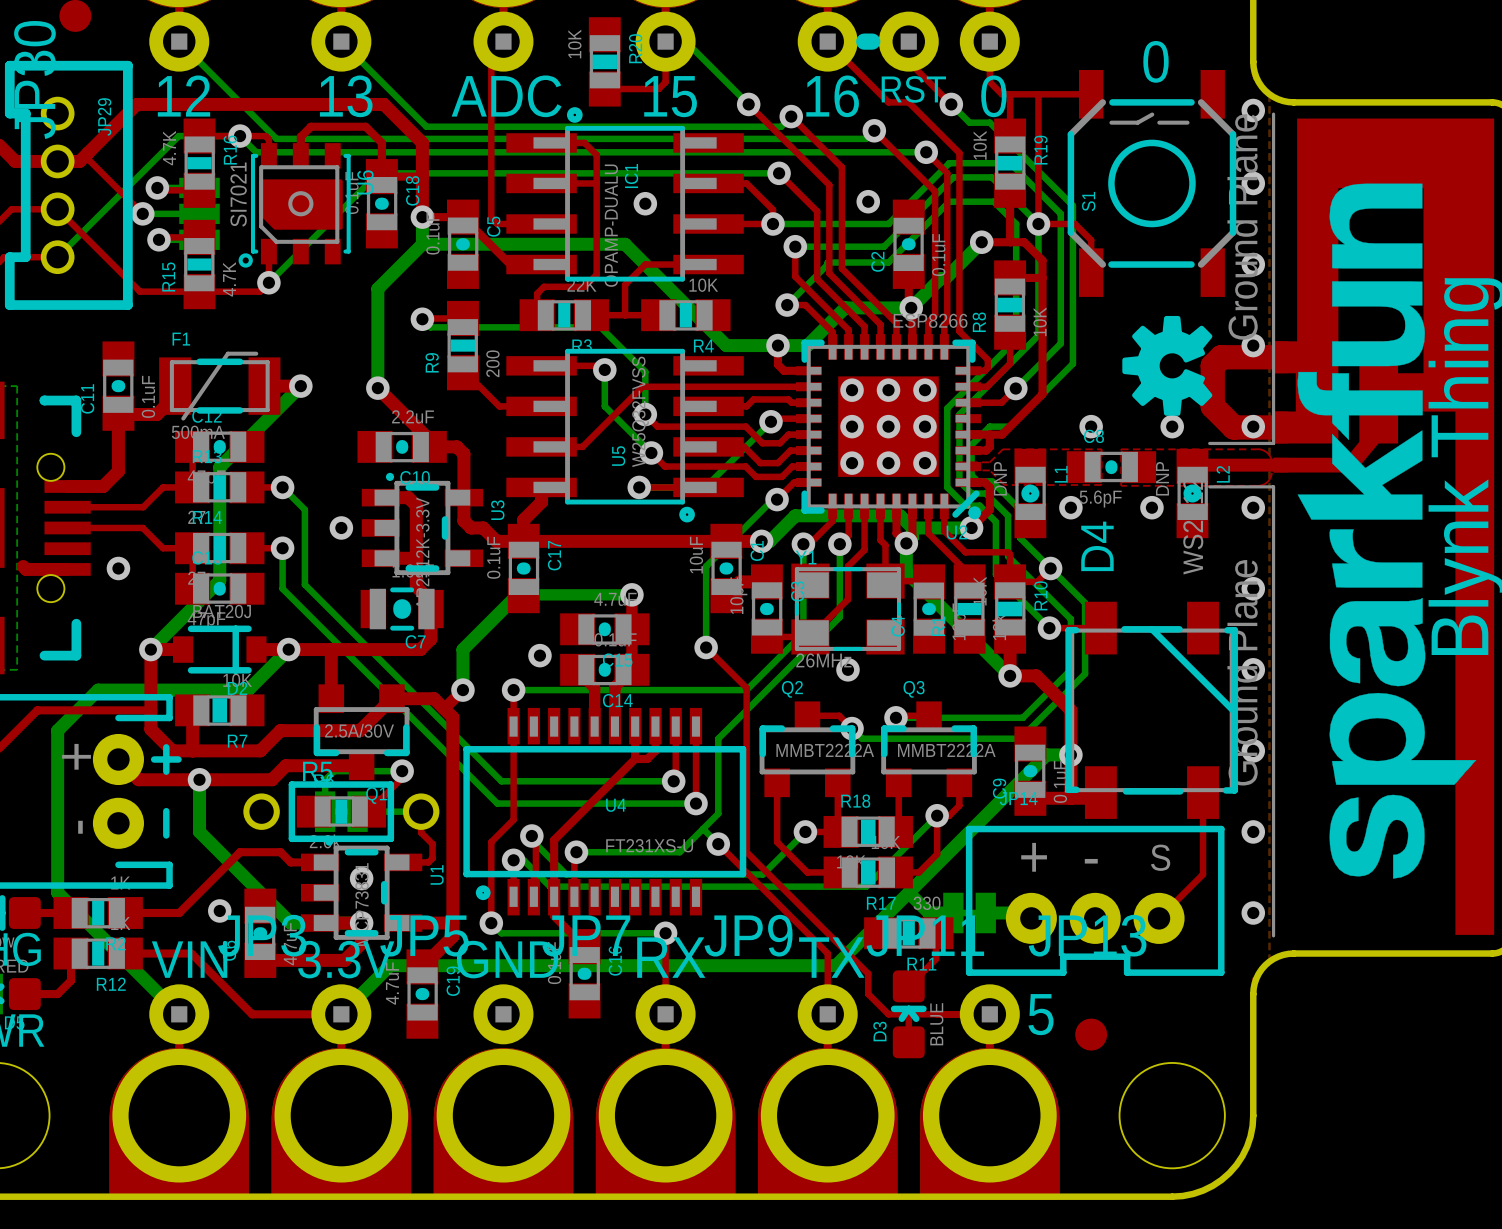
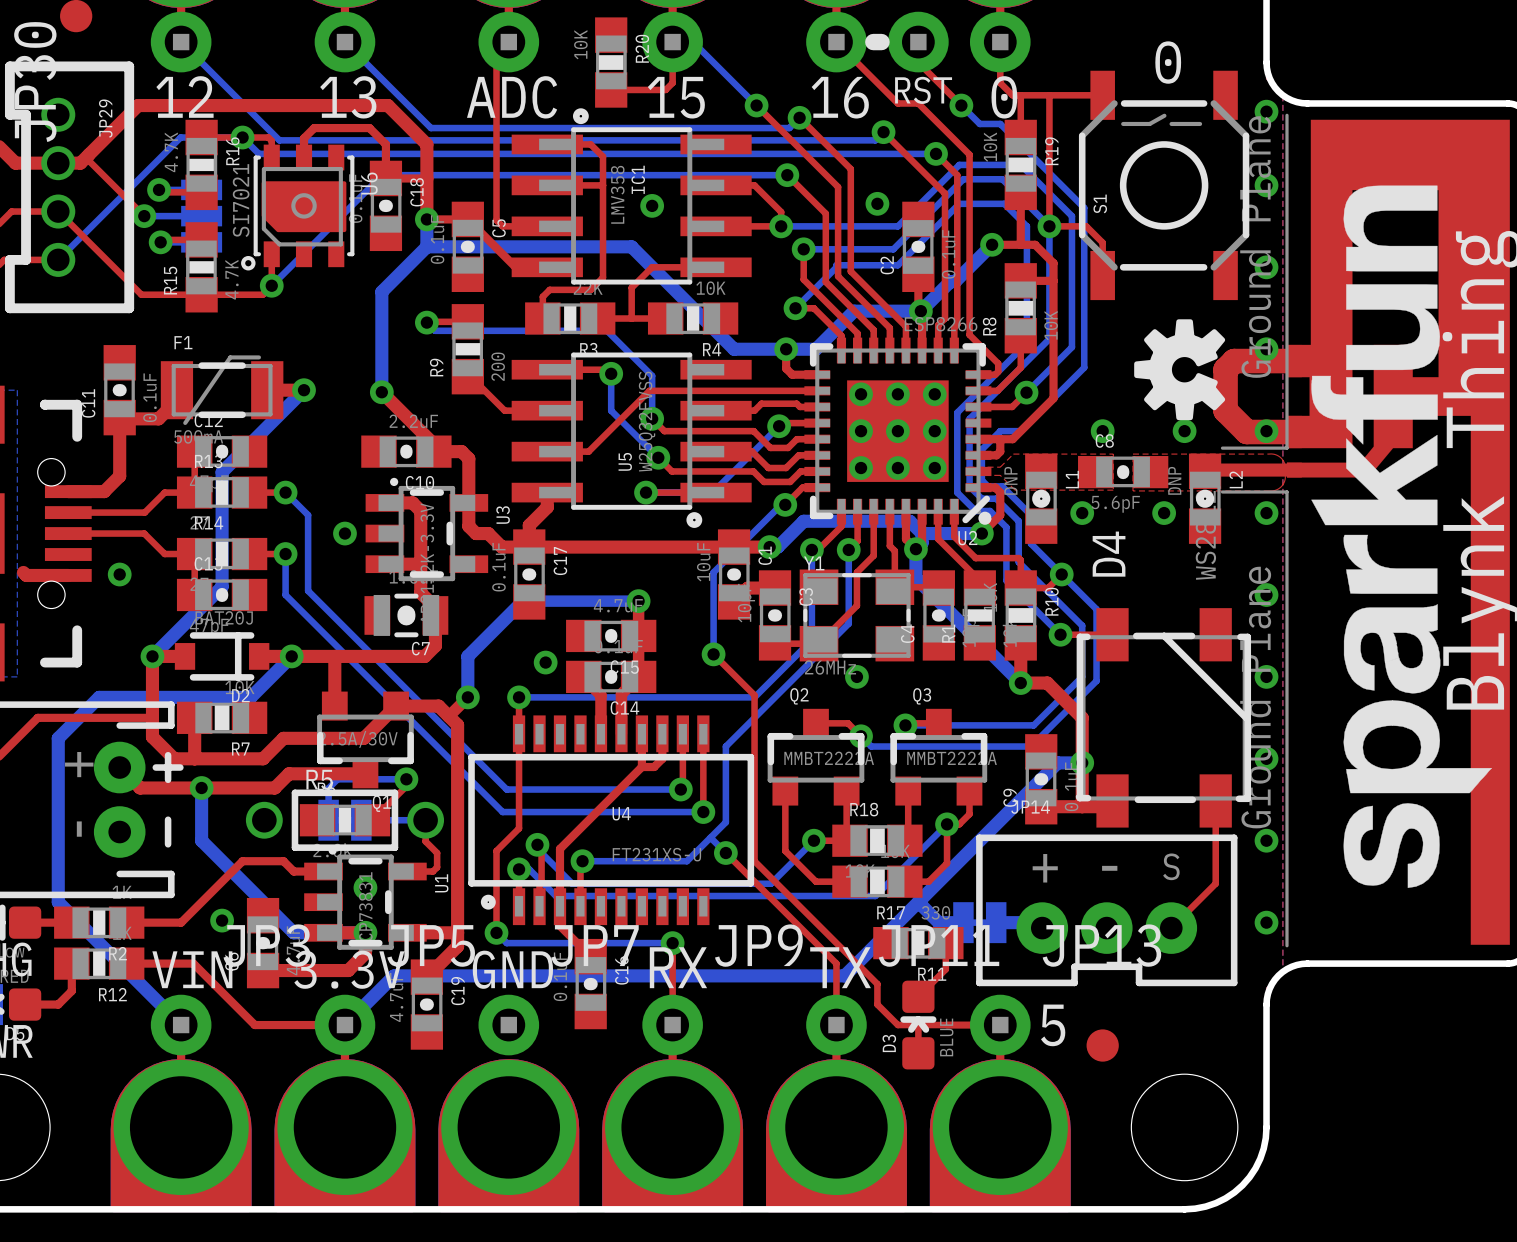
IC1 value: OPAMP-DUALU (611, 225) -> LMV358 (617, 194)

